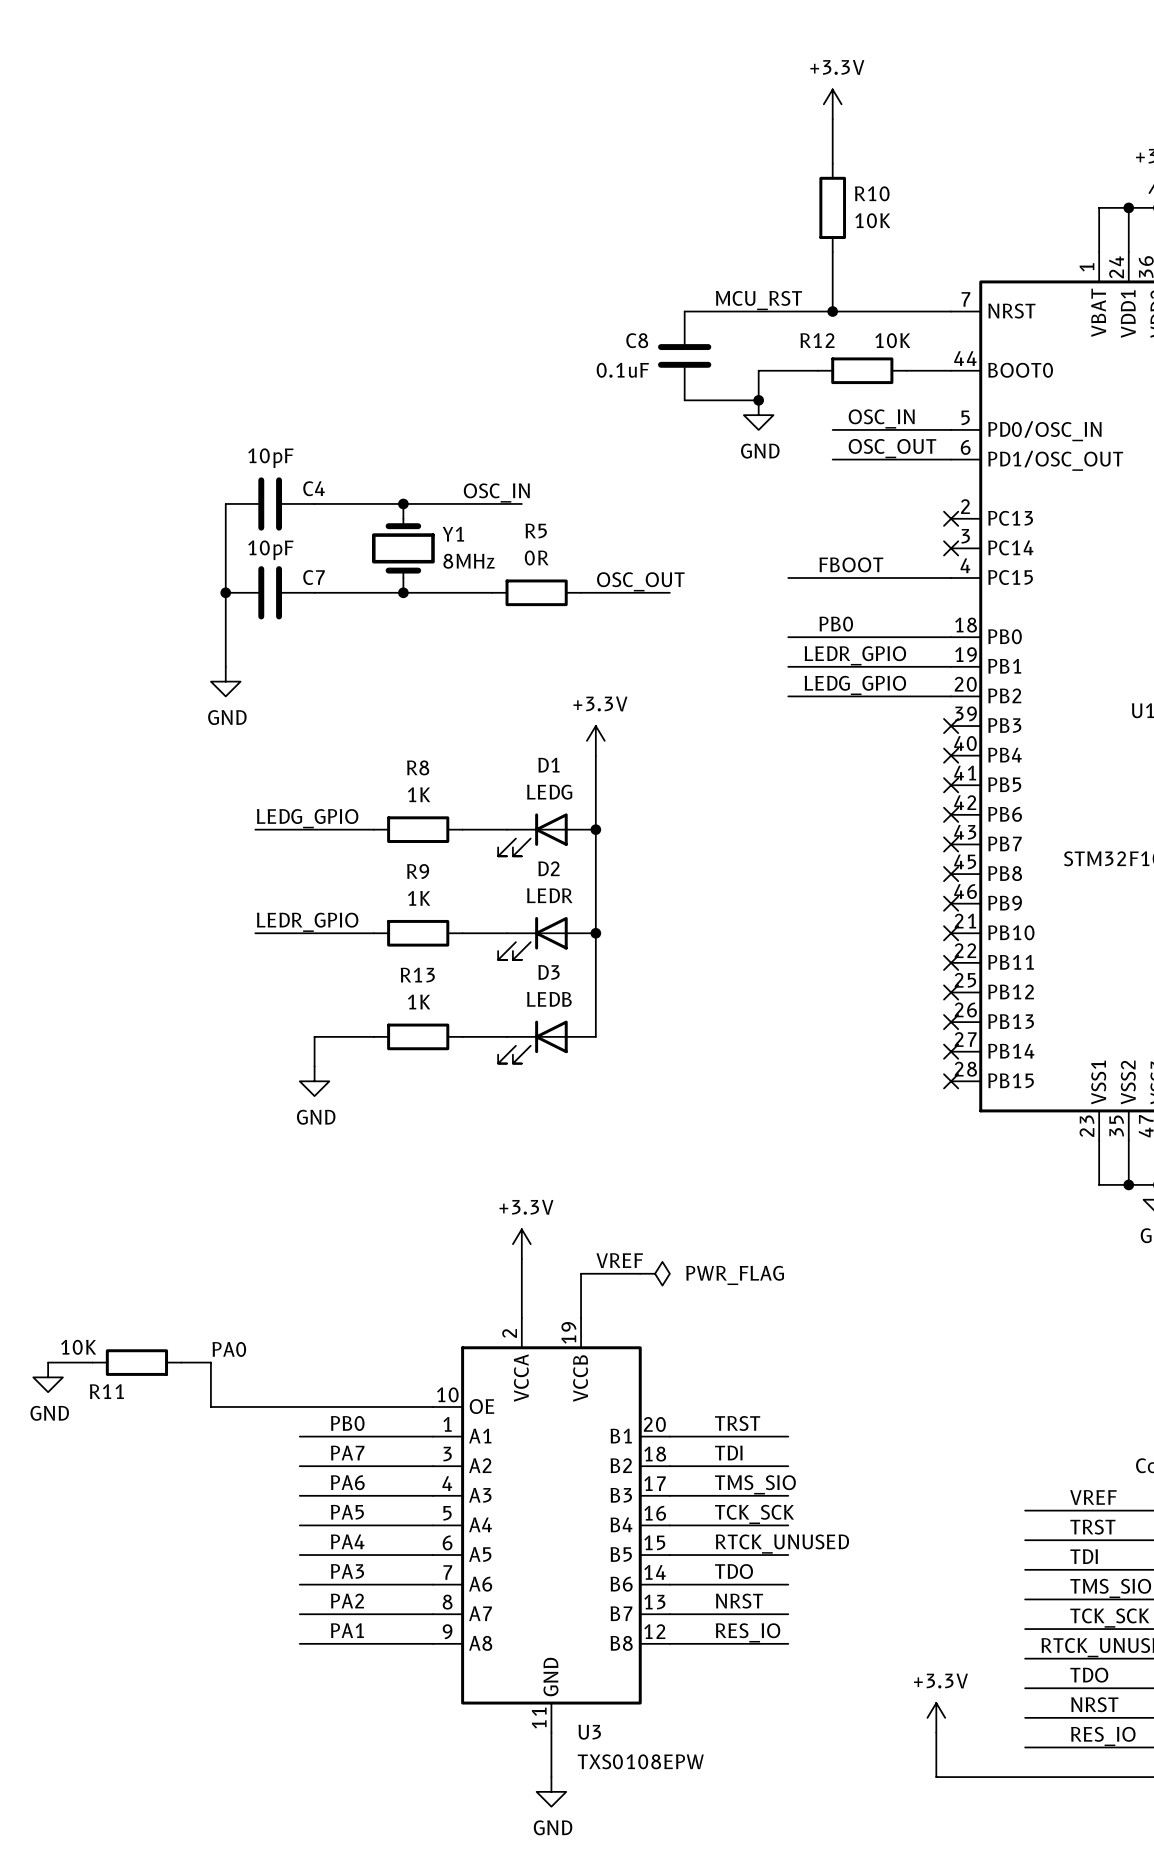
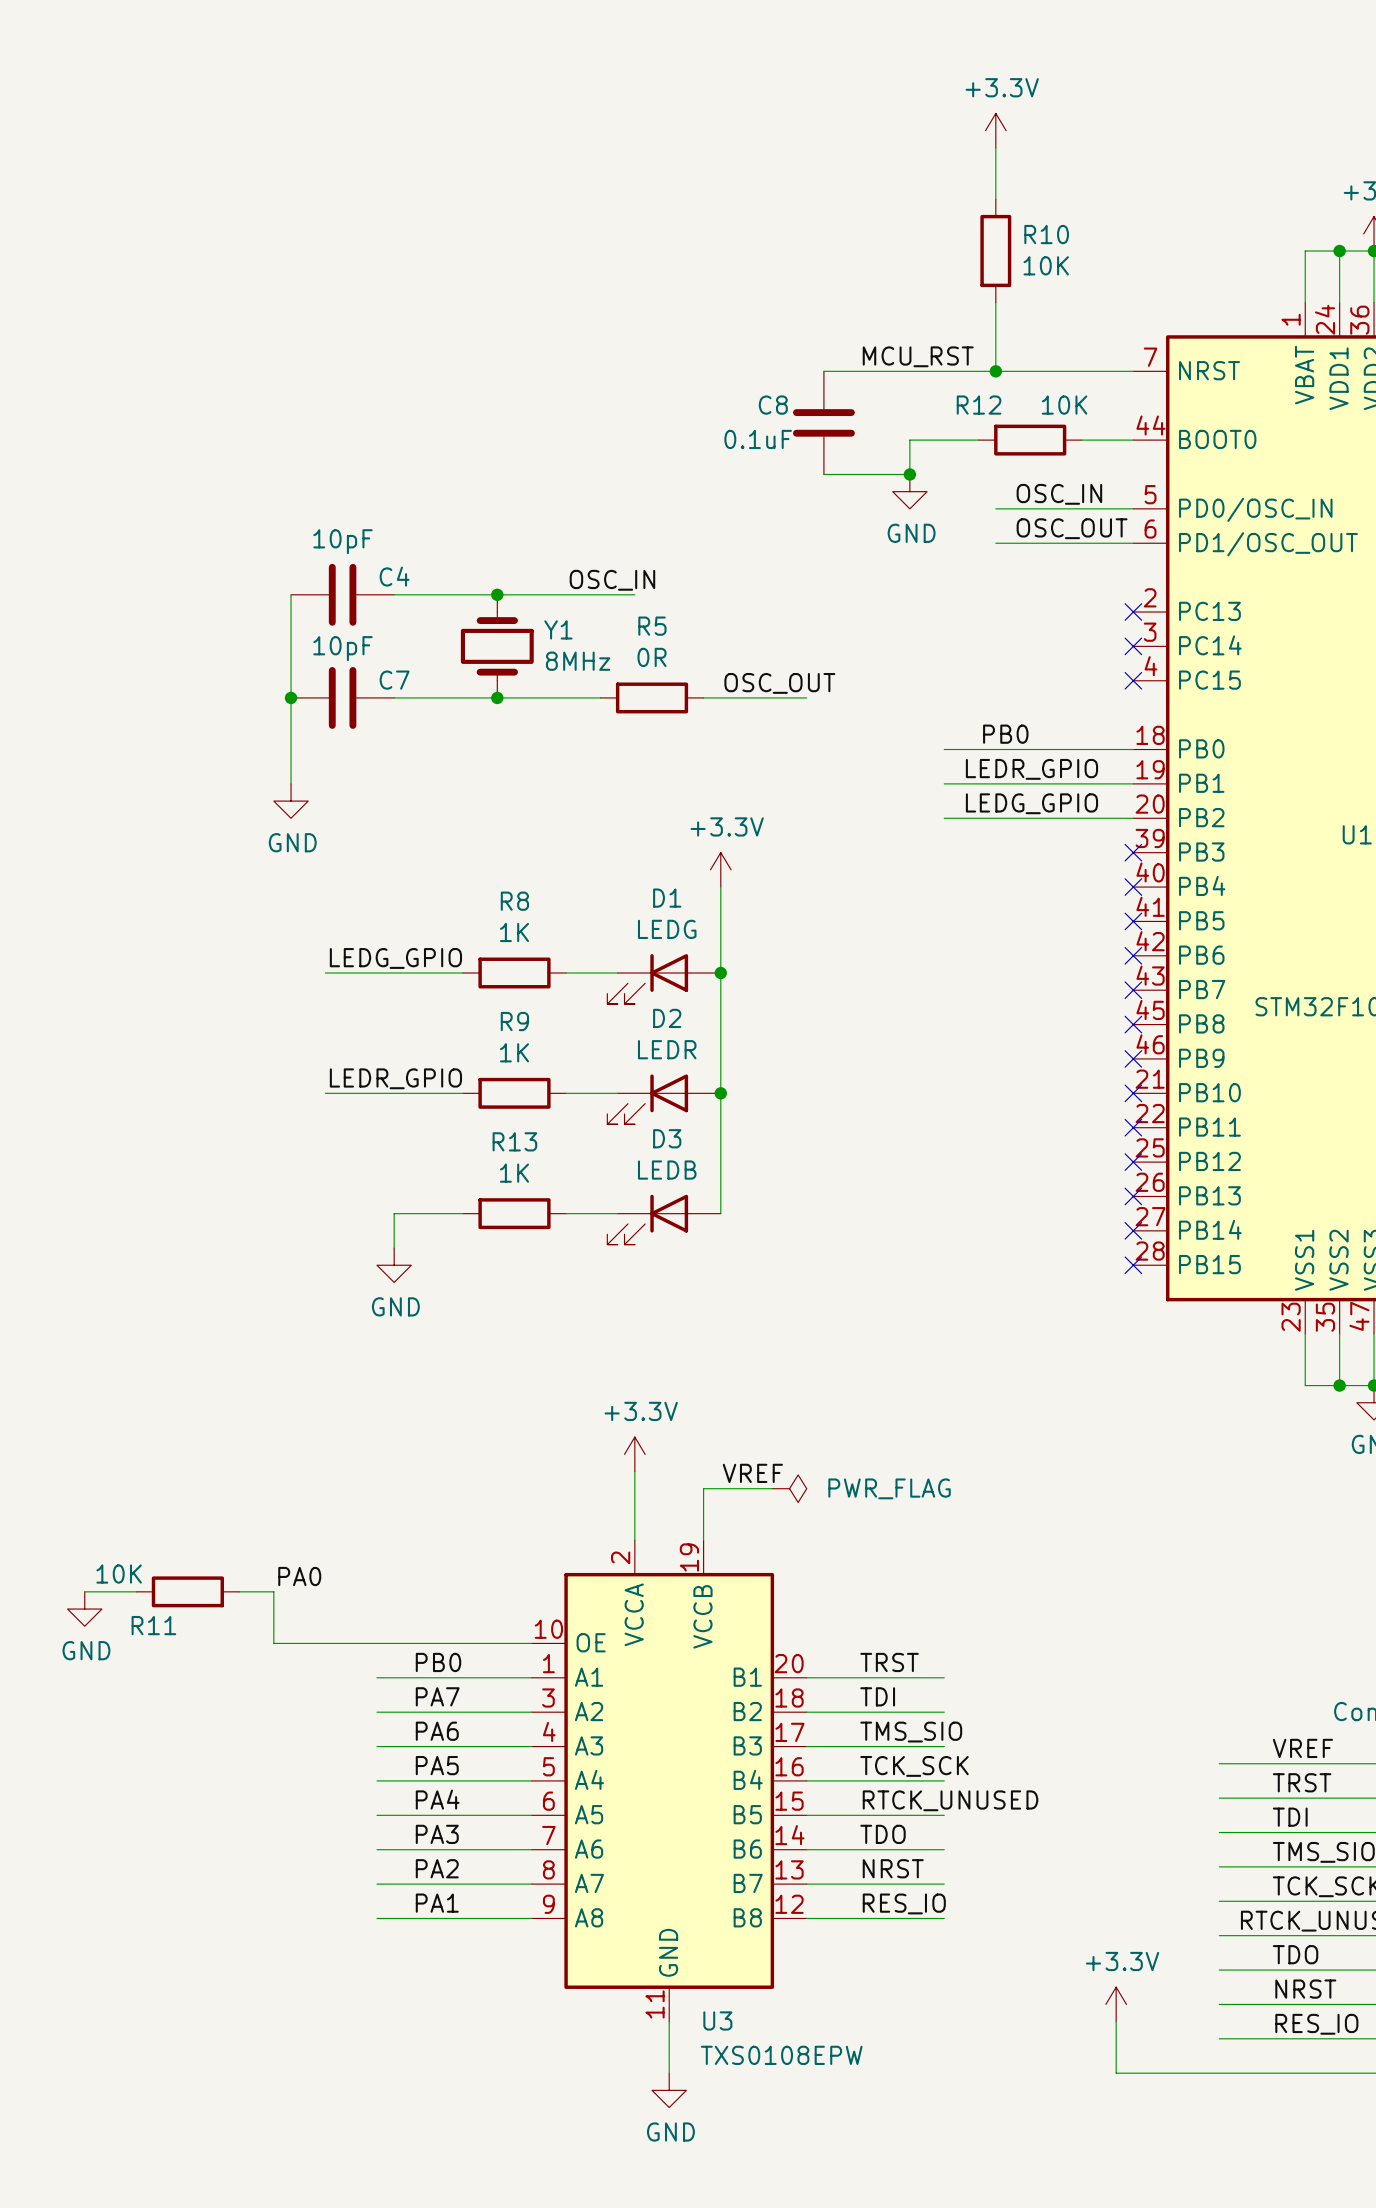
label: FBOOT (851, 564) -> none
wire: (788, 577) (951, 577) -> none
no-connect mark: none -> (1133, 680)

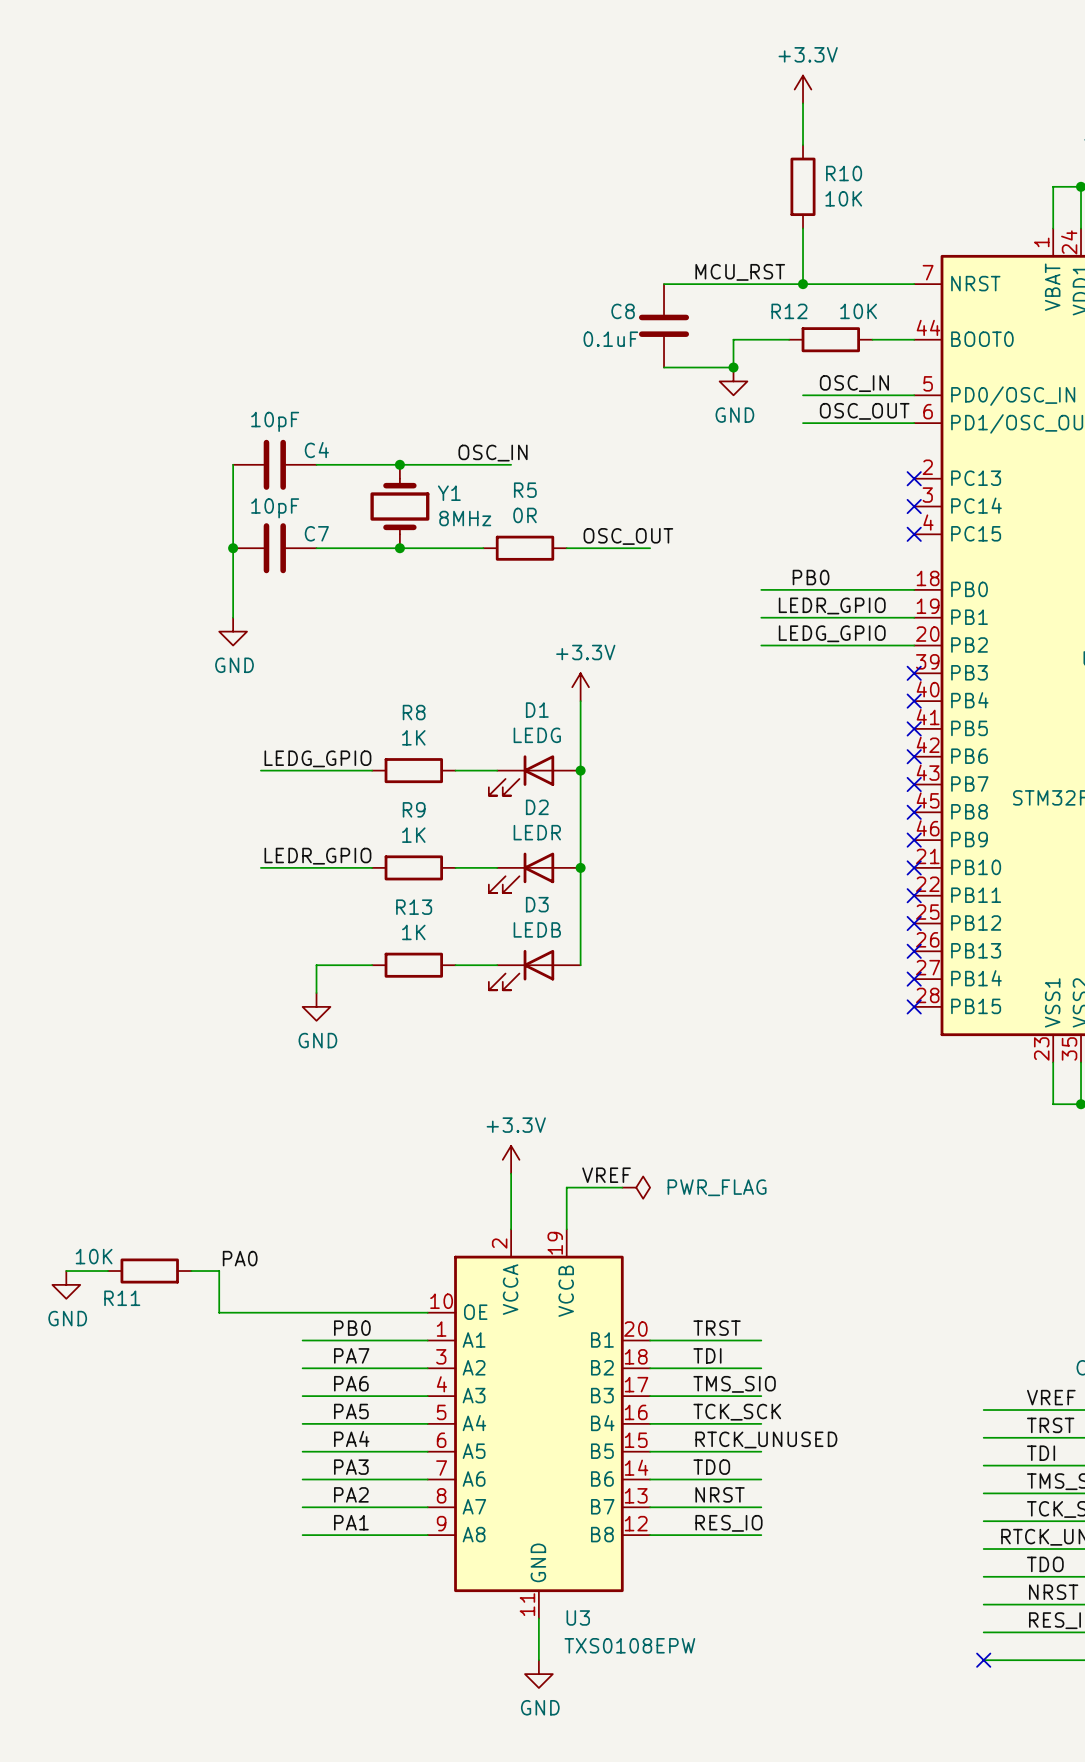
power symbol: +3.3V (1116, 2004) -> none
wire: (1116, 2021) (1116, 2073) (1219, 2073) -> none
no-connect mark: none -> (983, 1660)

